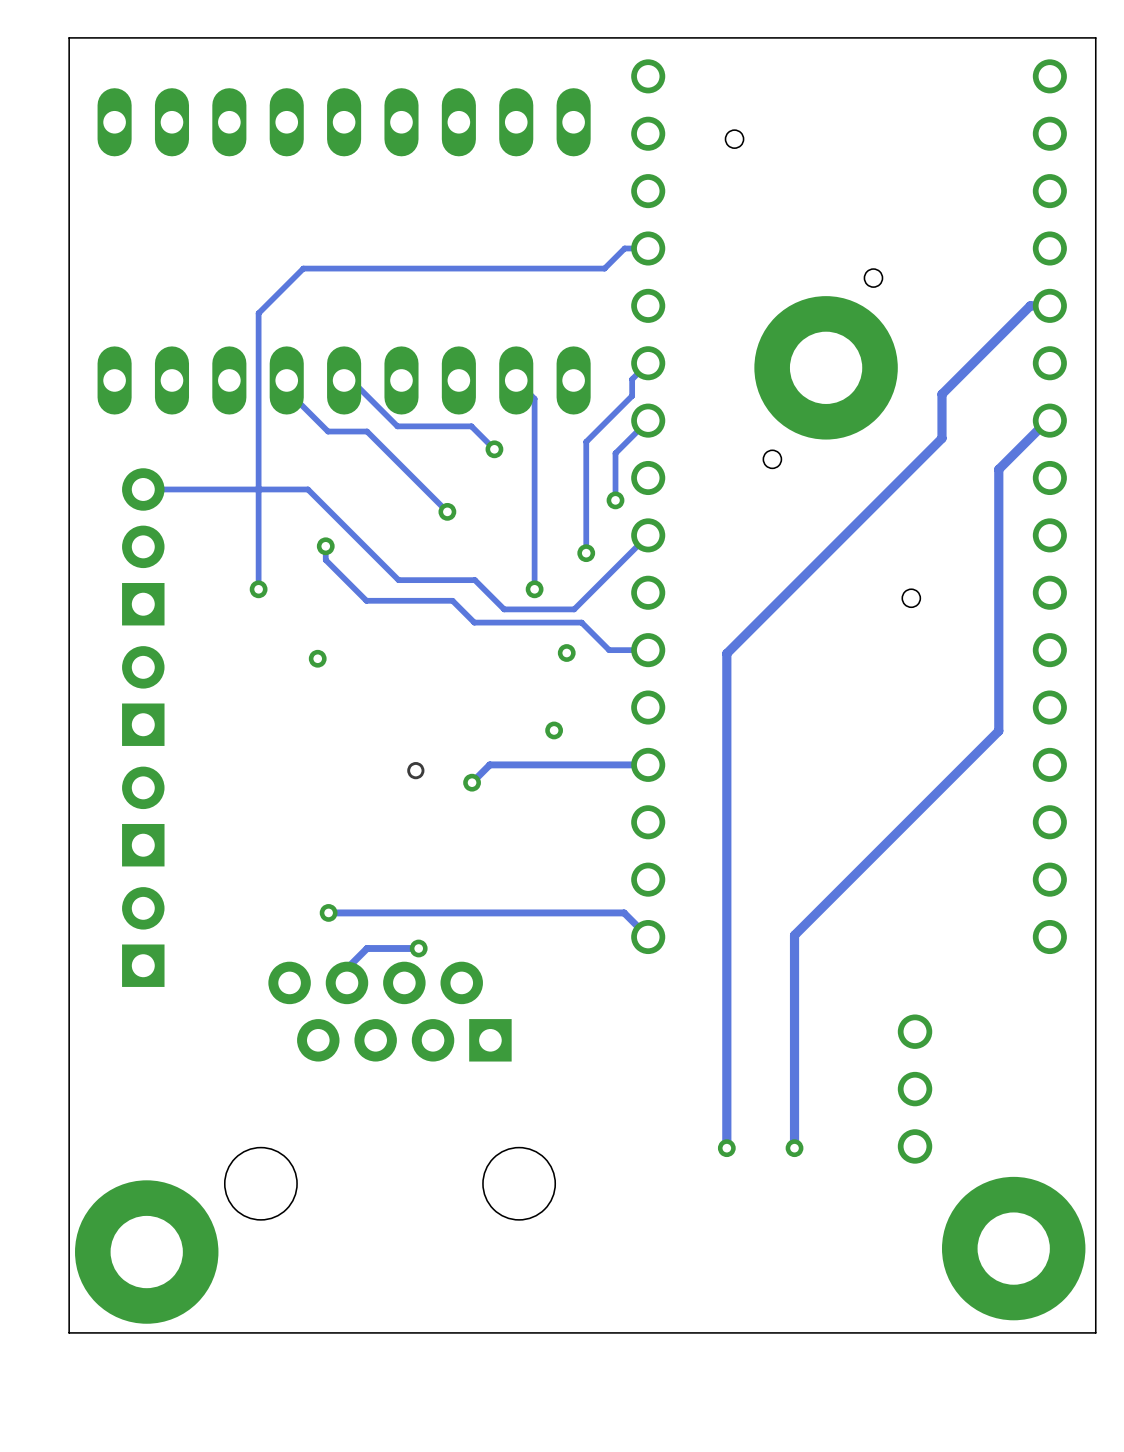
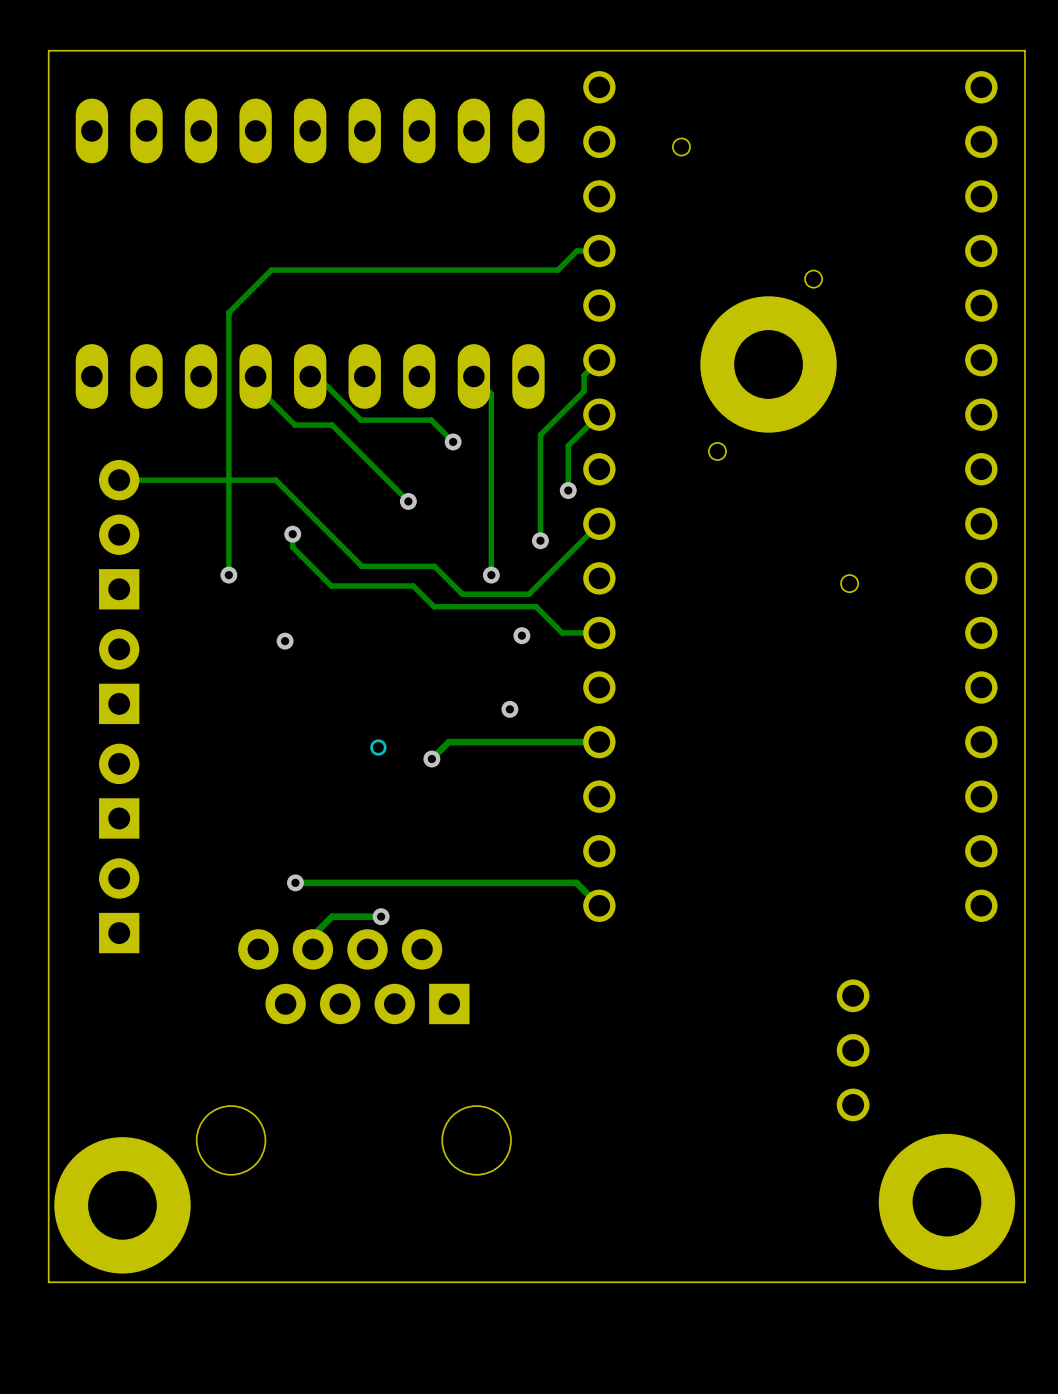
track: (1049, 305) (1030, 305) (941, 394) (941, 438) (726, 653) (726, 1148) -> none
track: (1049, 420) (1047, 420) (998, 469) (998, 731) (794, 935) (794, 1148) -> none
via: (726, 1148) -> none
via: (794, 1148) -> none

